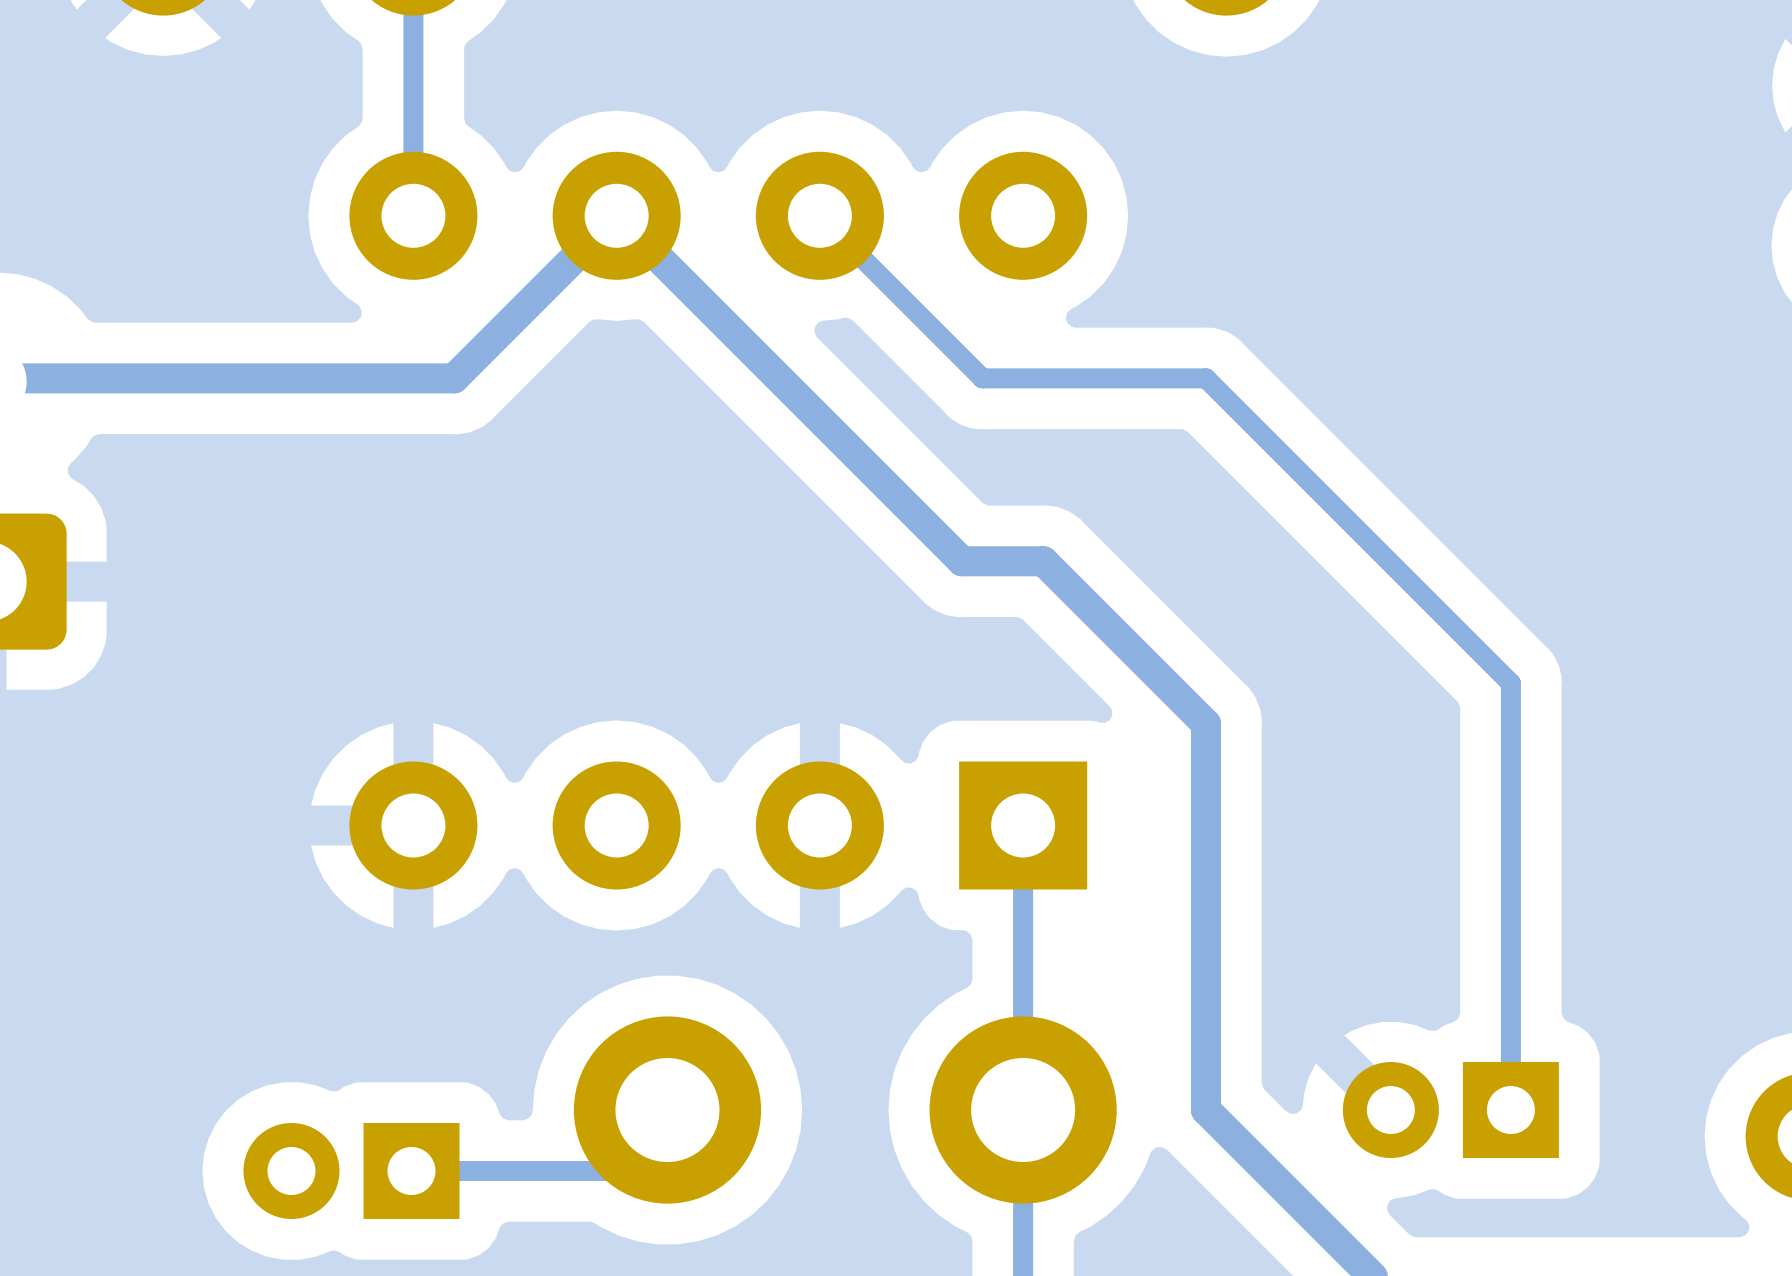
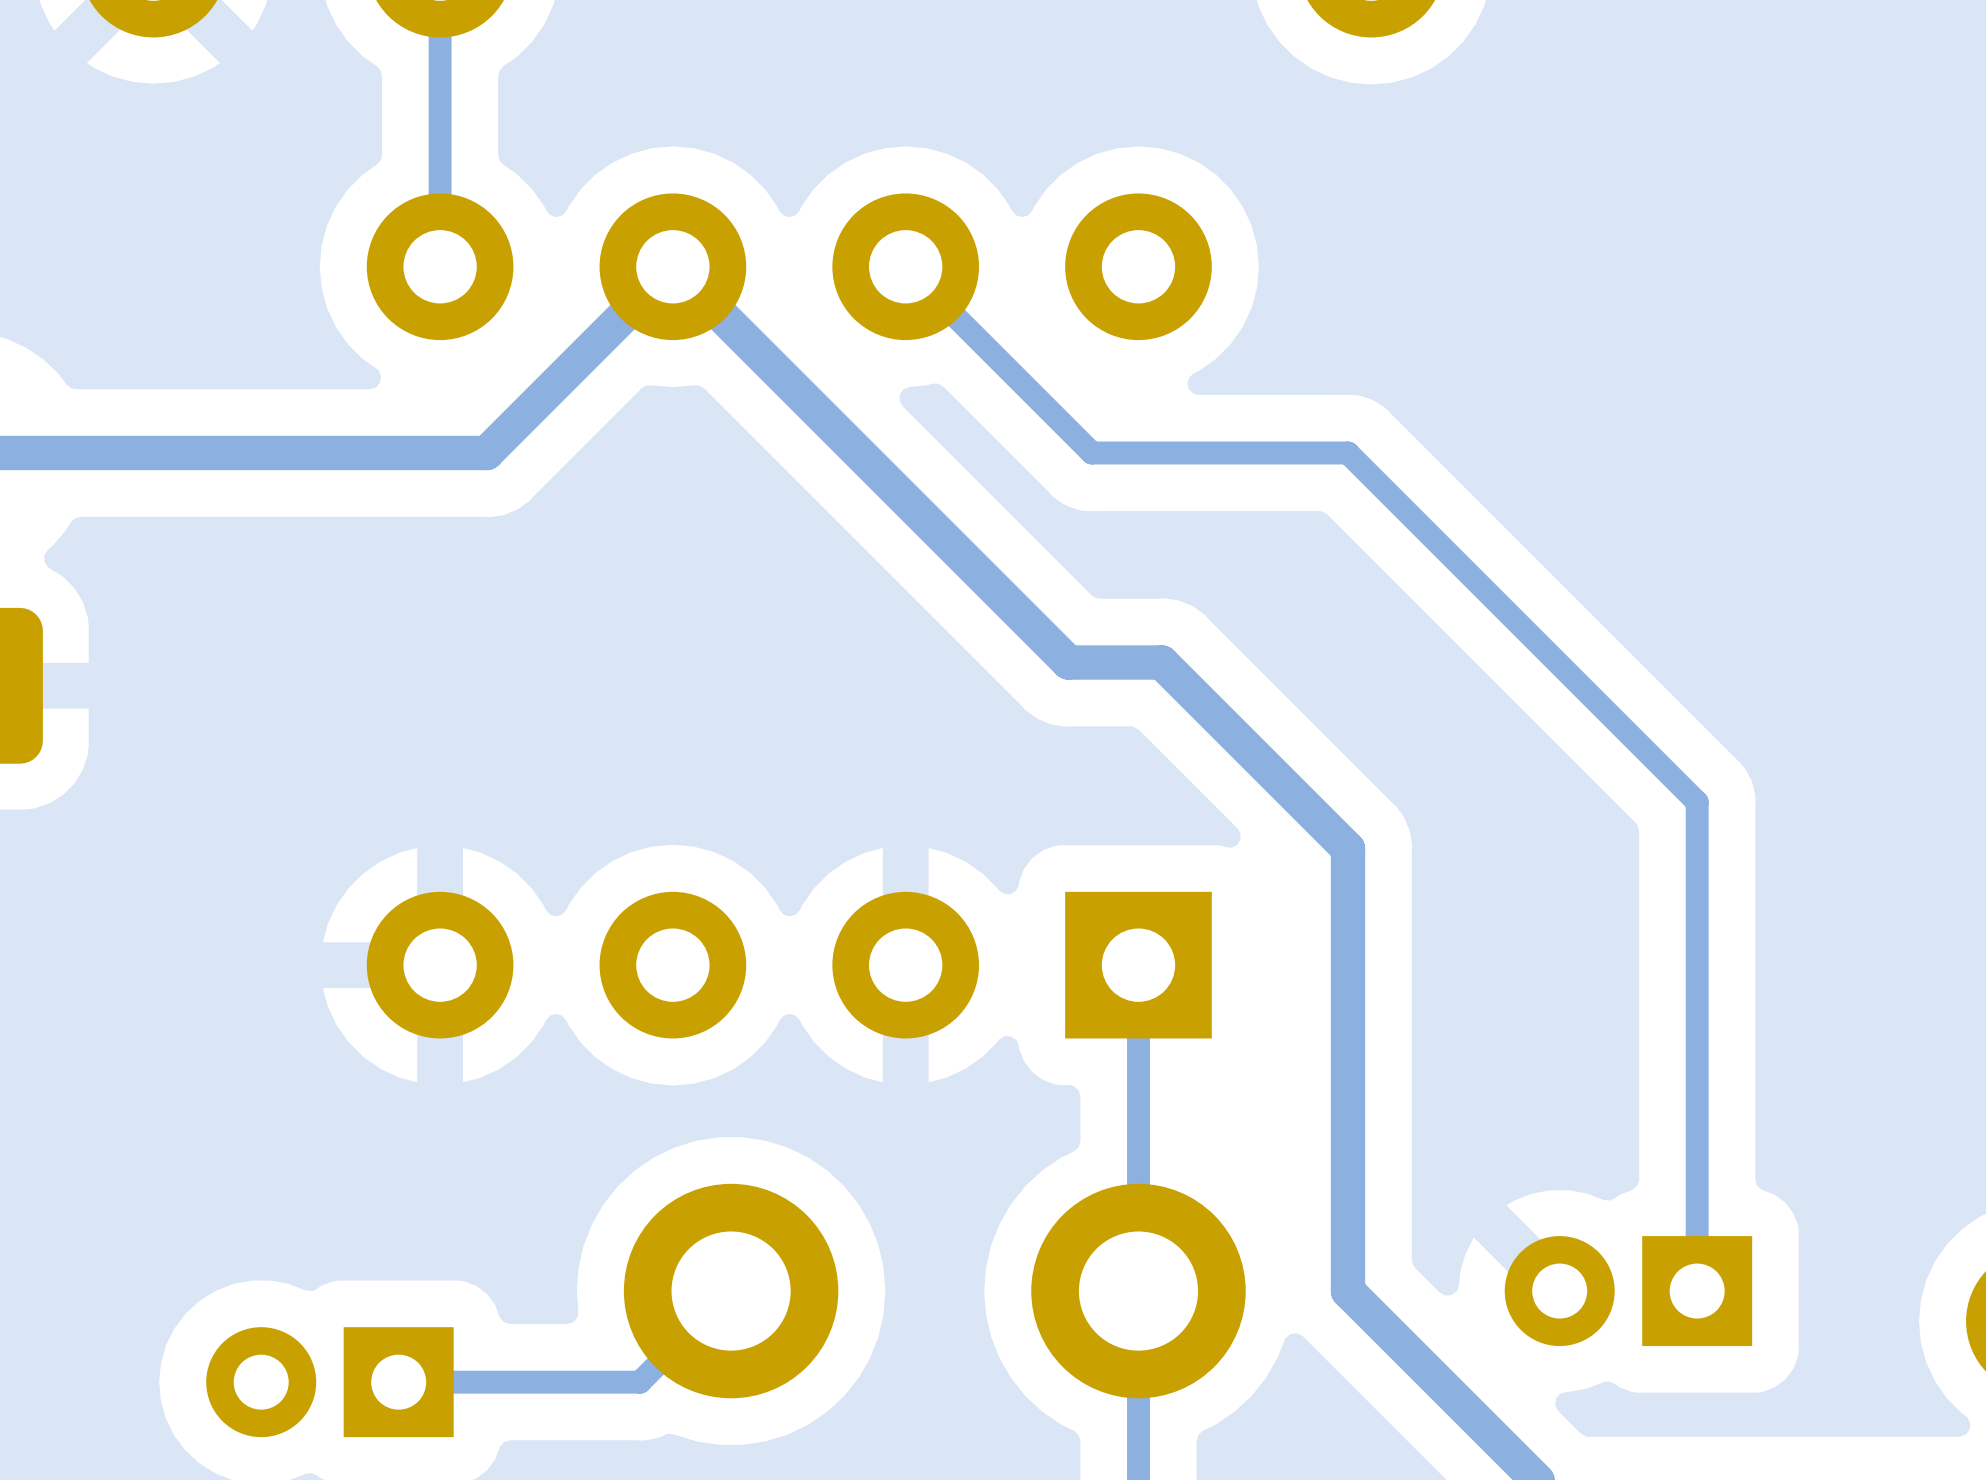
part position: (351, 1171) -> (329, 1382)
track: (606, 1171) (411, 1171) -> (661, 1360) (639, 1382) (398, 1382)

